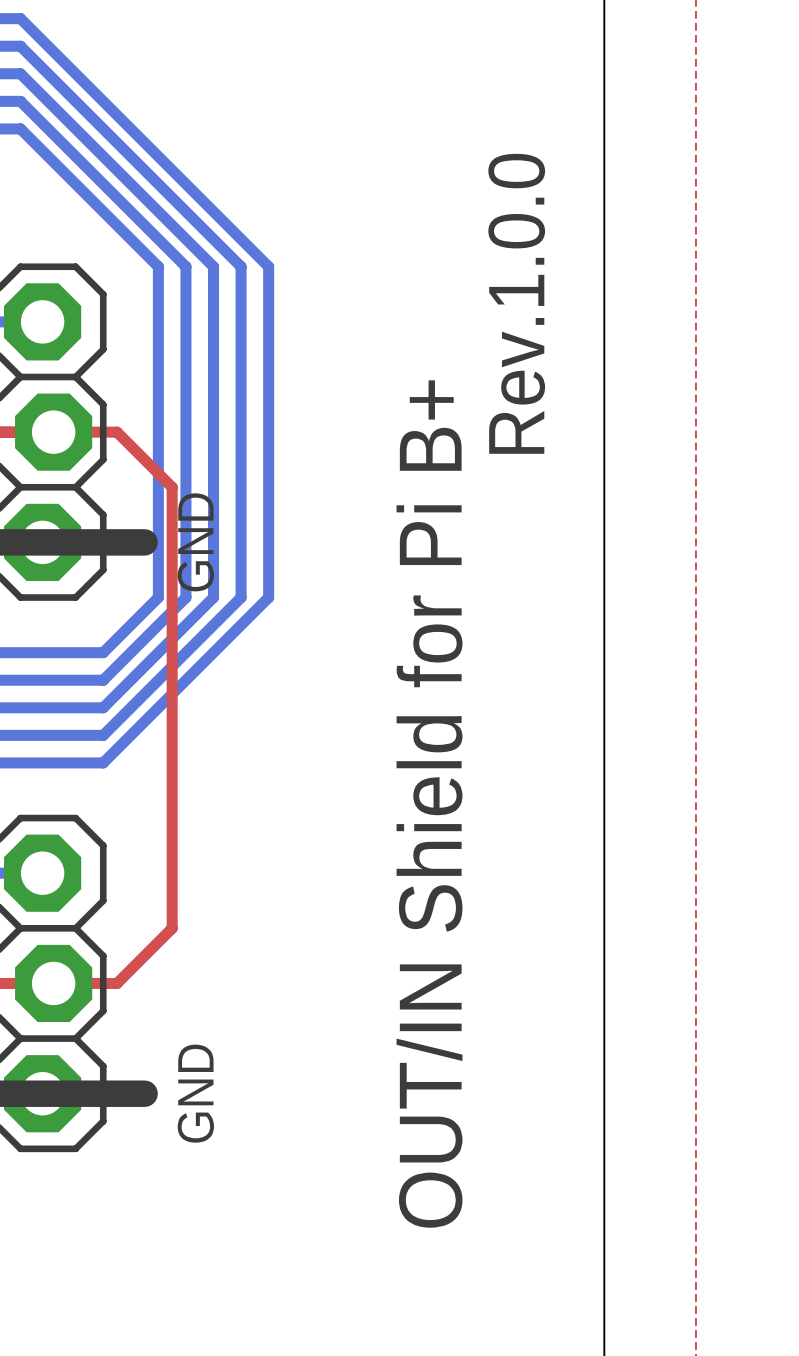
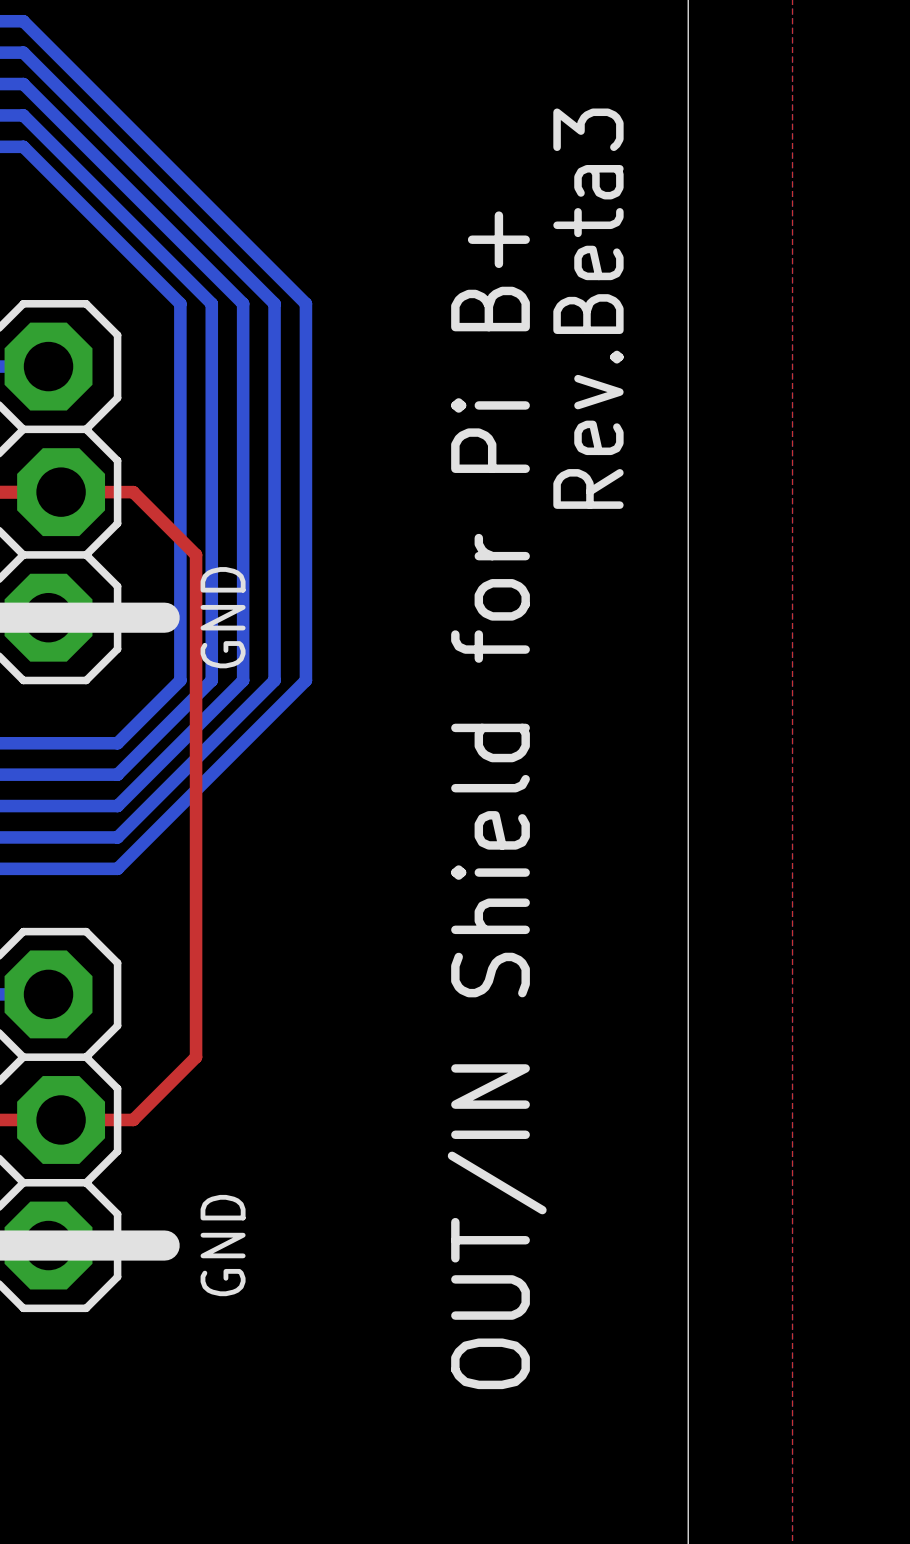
text: Rev.1.0.0 (516, 303) -> Rev.Beta3 (588, 308)

